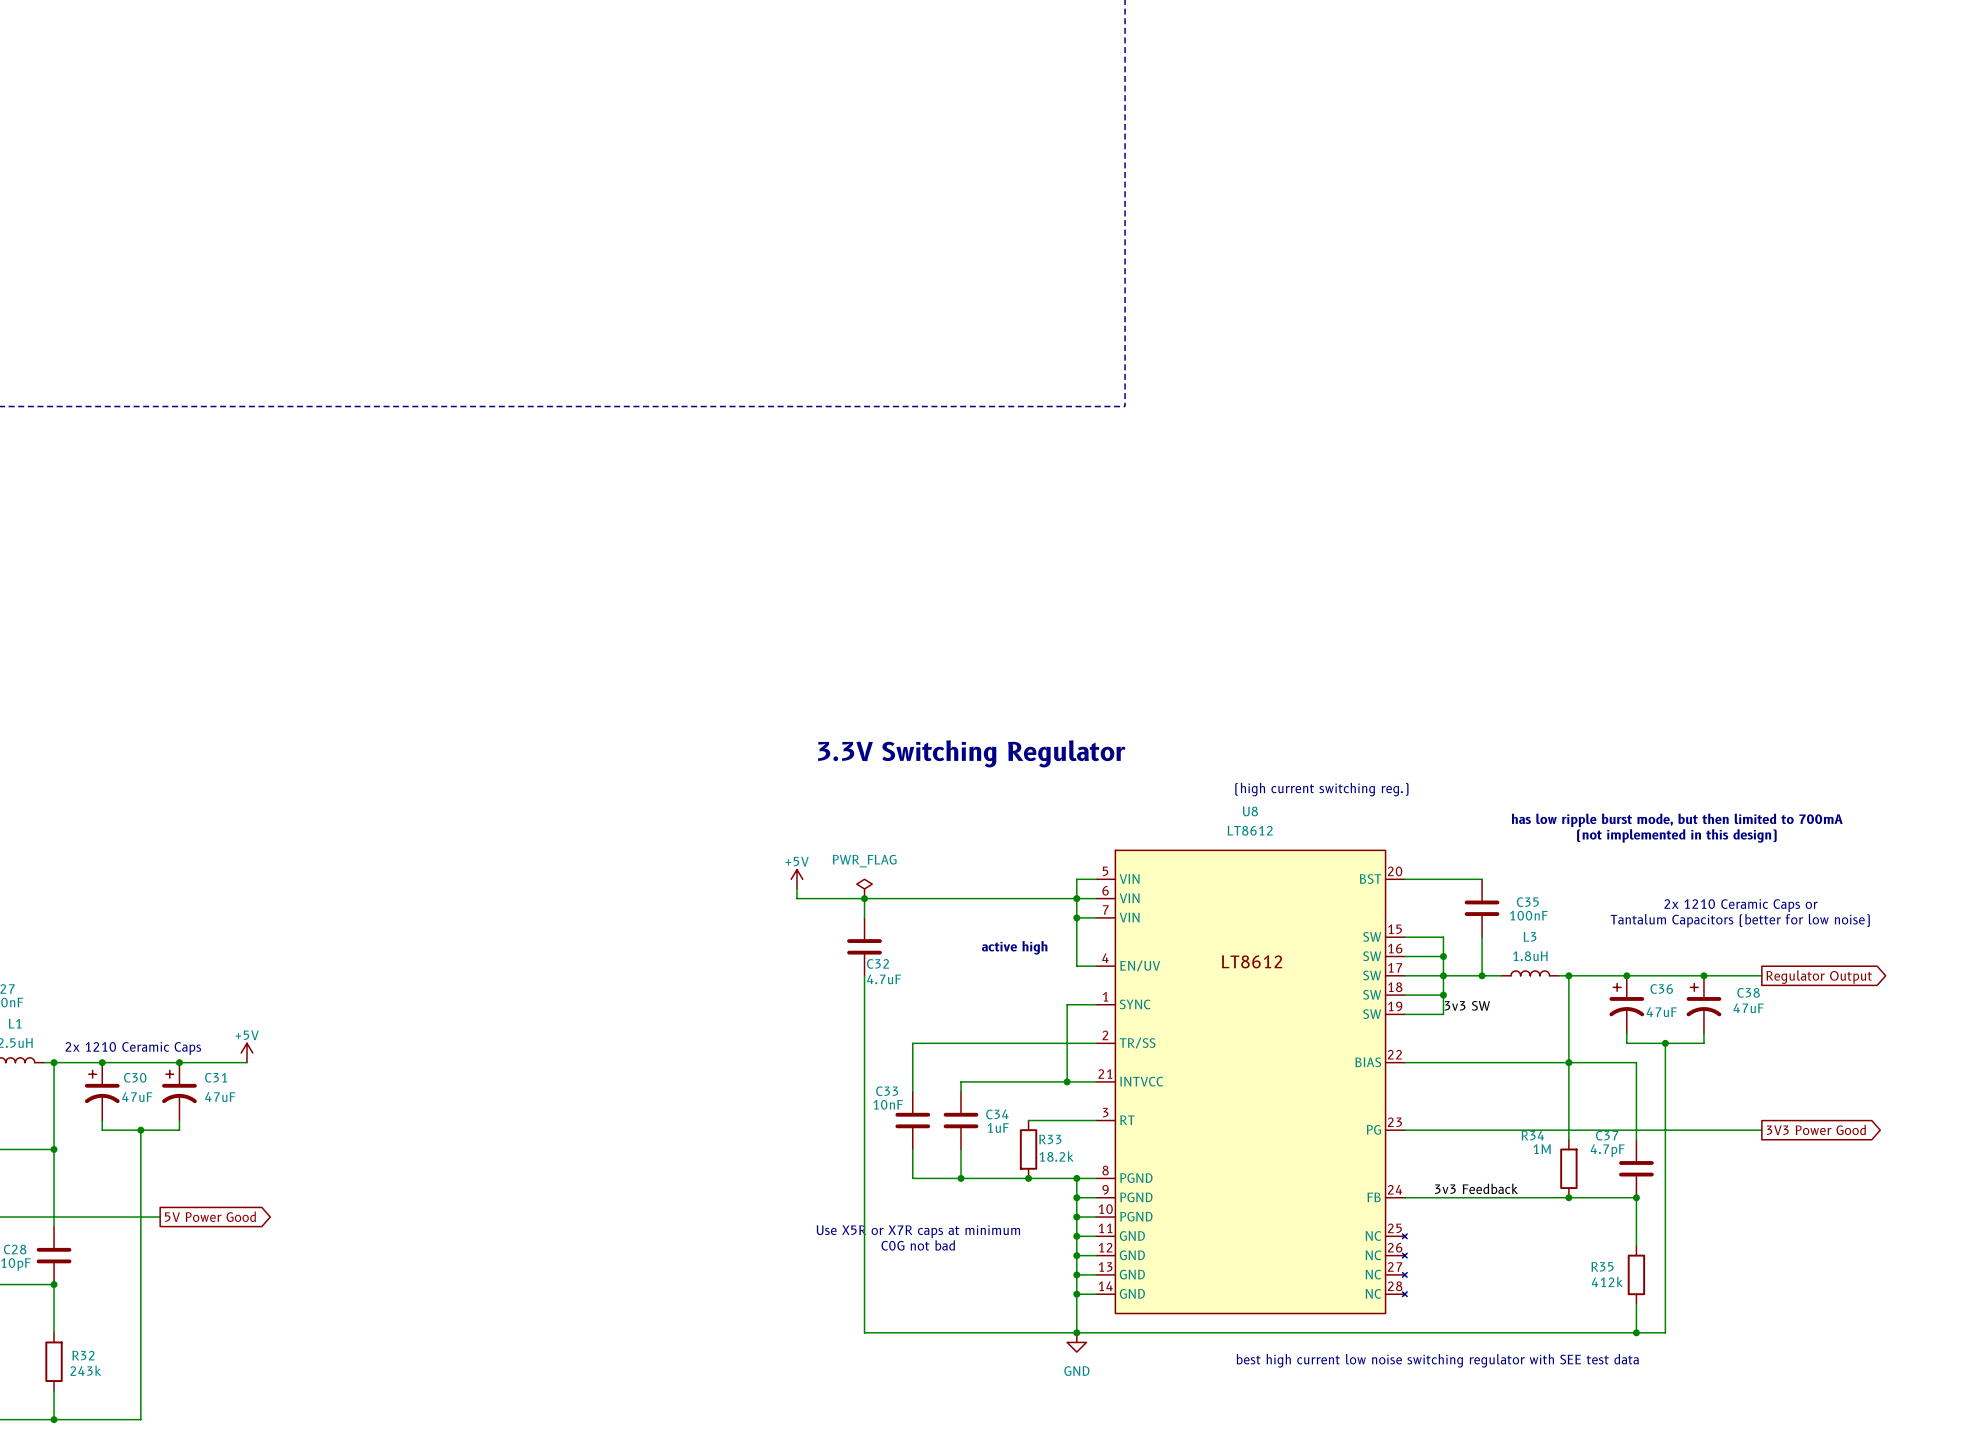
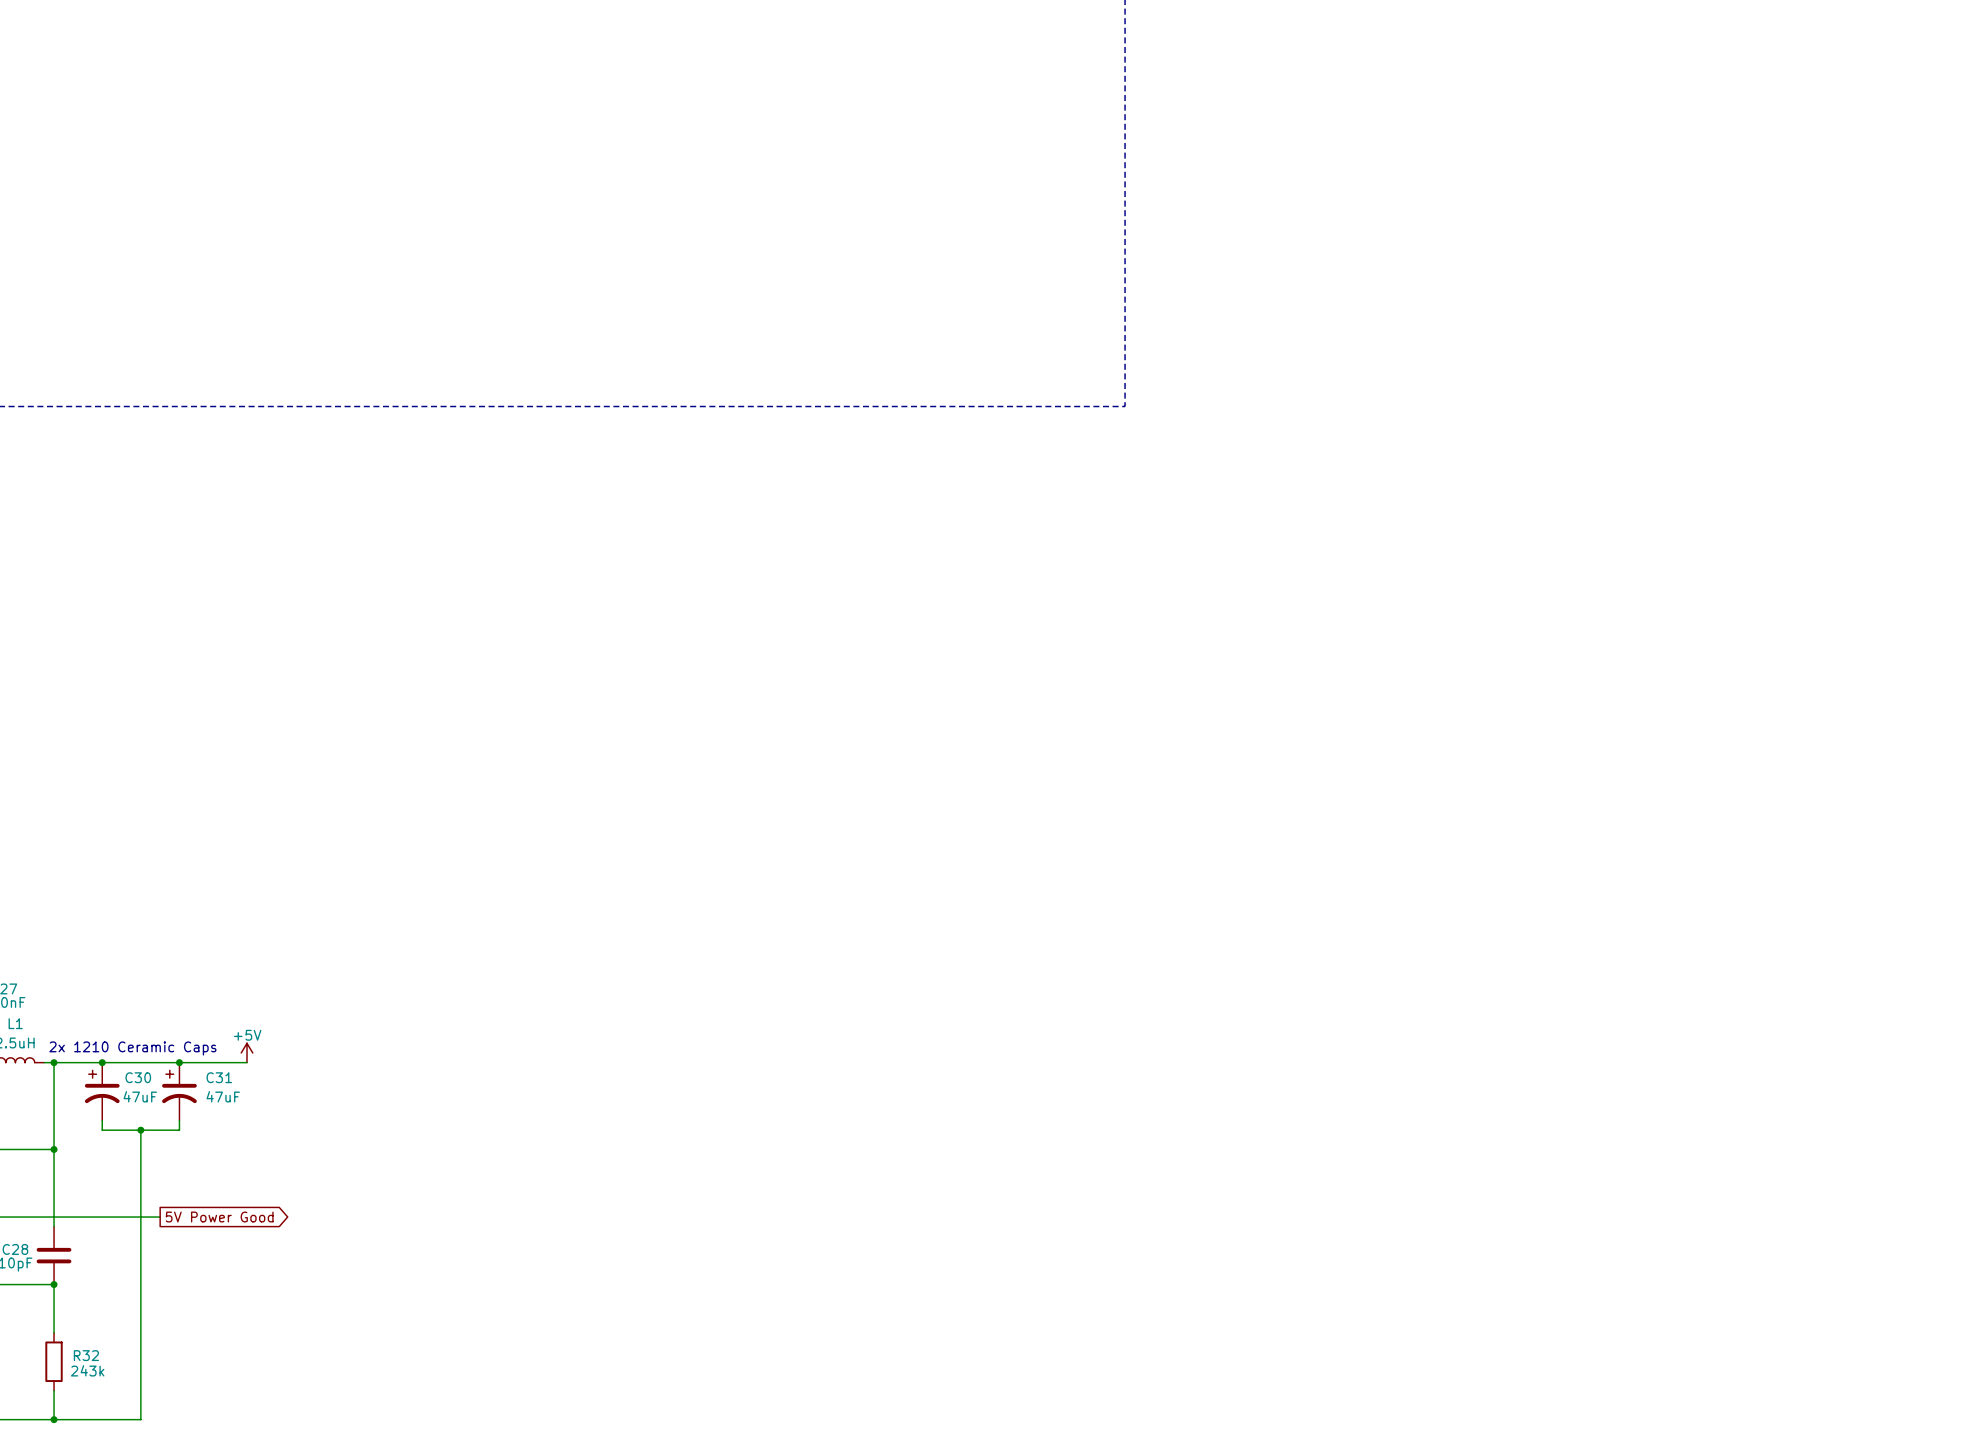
text: 3.3V Switching Regulator (971, 753) -> none
text: (high current switching reg.) (1321, 789) -> none
text: has low ripple burst mode, but then limited to 700mA (1677, 820) -> none
text: (not implemented in this design) (1676, 835) -> none
power symbol: +5V (796, 879) -> none
wire: (1096, 879) (1076, 879) (1076, 966) (1096, 966) -> none
wire: (1404, 879) (1482, 879) -> none
wire: (796, 888) (796, 898) (1096, 898) -> none
power symbol: PWR_FLAG (864, 888) -> none
wire: (864, 898) (864, 917) -> none
junction: (864, 898) -> none
junction: (1076, 898) -> none
text: 2x 1210 Ceramic Caps or (1741, 905) -> none
C35: 100nF (1482, 908) -> none
wire: (1076, 917) (1096, 917) -> none
junction: (1076, 917) -> none
text: Tantalum Capacitors (better for low noise) (1740, 920) -> none
wire: (1404, 937) (1443, 937) (1443, 1014) (1404, 1014) -> none
wire: (1482, 937) (1482, 975) -> none
C32: 4.7uF (864, 946) -> none
text: active high (1014, 947) -> none
wire: (1404, 956) (1443, 956) -> none
junction: (1443, 956) -> none
L3: 1.8uH (1530, 973) -> none
wire: (864, 975) (864, 1332) (1665, 1332) (1665, 1043) -> none
wire: (1404, 975) (1501, 975) -> none
junction: (1443, 975) -> none
junction: (1482, 975) -> none
wire: (1559, 975) (1761, 975) -> none
wire: (1568, 975) (1568, 1139) -> none
junction: (1568, 975) -> none
junction: (1626, 975) -> none
junction: (1703, 975) -> none
global label: Regulator Output (1819, 977) -> none
wire: (1404, 995) (1443, 995) -> none
junction: (1443, 995) -> none
wire: (1096, 1004) (1067, 1004) (1067, 1081) -> none
C36: 47uF (1626, 1004) -> none
C38: 47uF (1703, 1004) -> none
label: 3v3 SW (1467, 1005) -> none
wire: (1626, 1033) (1626, 1043) (1703, 1043) (1703, 1033) -> none
wire: (1096, 1043) (912, 1043) (912, 1091) -> none
junction: (1665, 1043) -> none
wire: (1404, 1062) (1636, 1062) (1636, 1139) -> none
junction: (1568, 1062) -> none
junction: (1067, 1081) -> none
wire: (1096, 1081) (961, 1081) (961, 1091) -> none
U8: LT8612 (1251, 1081) -> none
C33: 10nF (912, 1120) -> none
C34: 1uF (961, 1120) -> none
wire: (1028, 1120) (1096, 1120) -> none
global label: 3V3 Power Good (1816, 1129) -> none
wire: (1404, 1130) (1761, 1130) -> none
wire: (912, 1149) (912, 1178) (1096, 1178) -> none
wire: (961, 1149) (961, 1178) -> none
R33: 18.2k (1028, 1149) -> none
R34: 1M (1568, 1168) -> none
C37: 4.7pF (1636, 1168) -> none
junction: (961, 1178) -> none
junction: (1028, 1178) -> none
wire: (1076, 1178) (1076, 1332) -> none
junction: (1076, 1178) -> none
label: 3v3 Feedback (1476, 1188) -> none
wire: (1076, 1197) (1096, 1197) -> none
junction: (1076, 1197) -> none
wire: (1404, 1197) (1636, 1197) (1636, 1245) -> none
junction: (1568, 1197) -> none
junction: (1636, 1197) -> none
wire: (1076, 1217) (1096, 1217) -> none
junction: (1076, 1217) -> none
text: Use X5R or X7R caps at minimum (918, 1231) -> none
wire: (1076, 1236) (1096, 1236) -> none
junction: (1076, 1236) -> none
text: C0G not bad (918, 1245) -> none
wire: (1076, 1255) (1096, 1255) -> none
junction: (1076, 1255) -> none
wire: (1076, 1274) (1096, 1274) -> none
junction: (1076, 1274) -> none
R35: 412k (1636, 1274) -> none
wire: (1076, 1294) (1096, 1294) -> none
junction: (1076, 1294) -> none
wire: (1636, 1303) (1636, 1332) -> none
junction: (1076, 1332) -> none
junction: (1636, 1332) -> none
power symbol: GND (1076, 1342) -> none
text: best high current low noise switching regulator with SEE test data (1437, 1360) -> none

